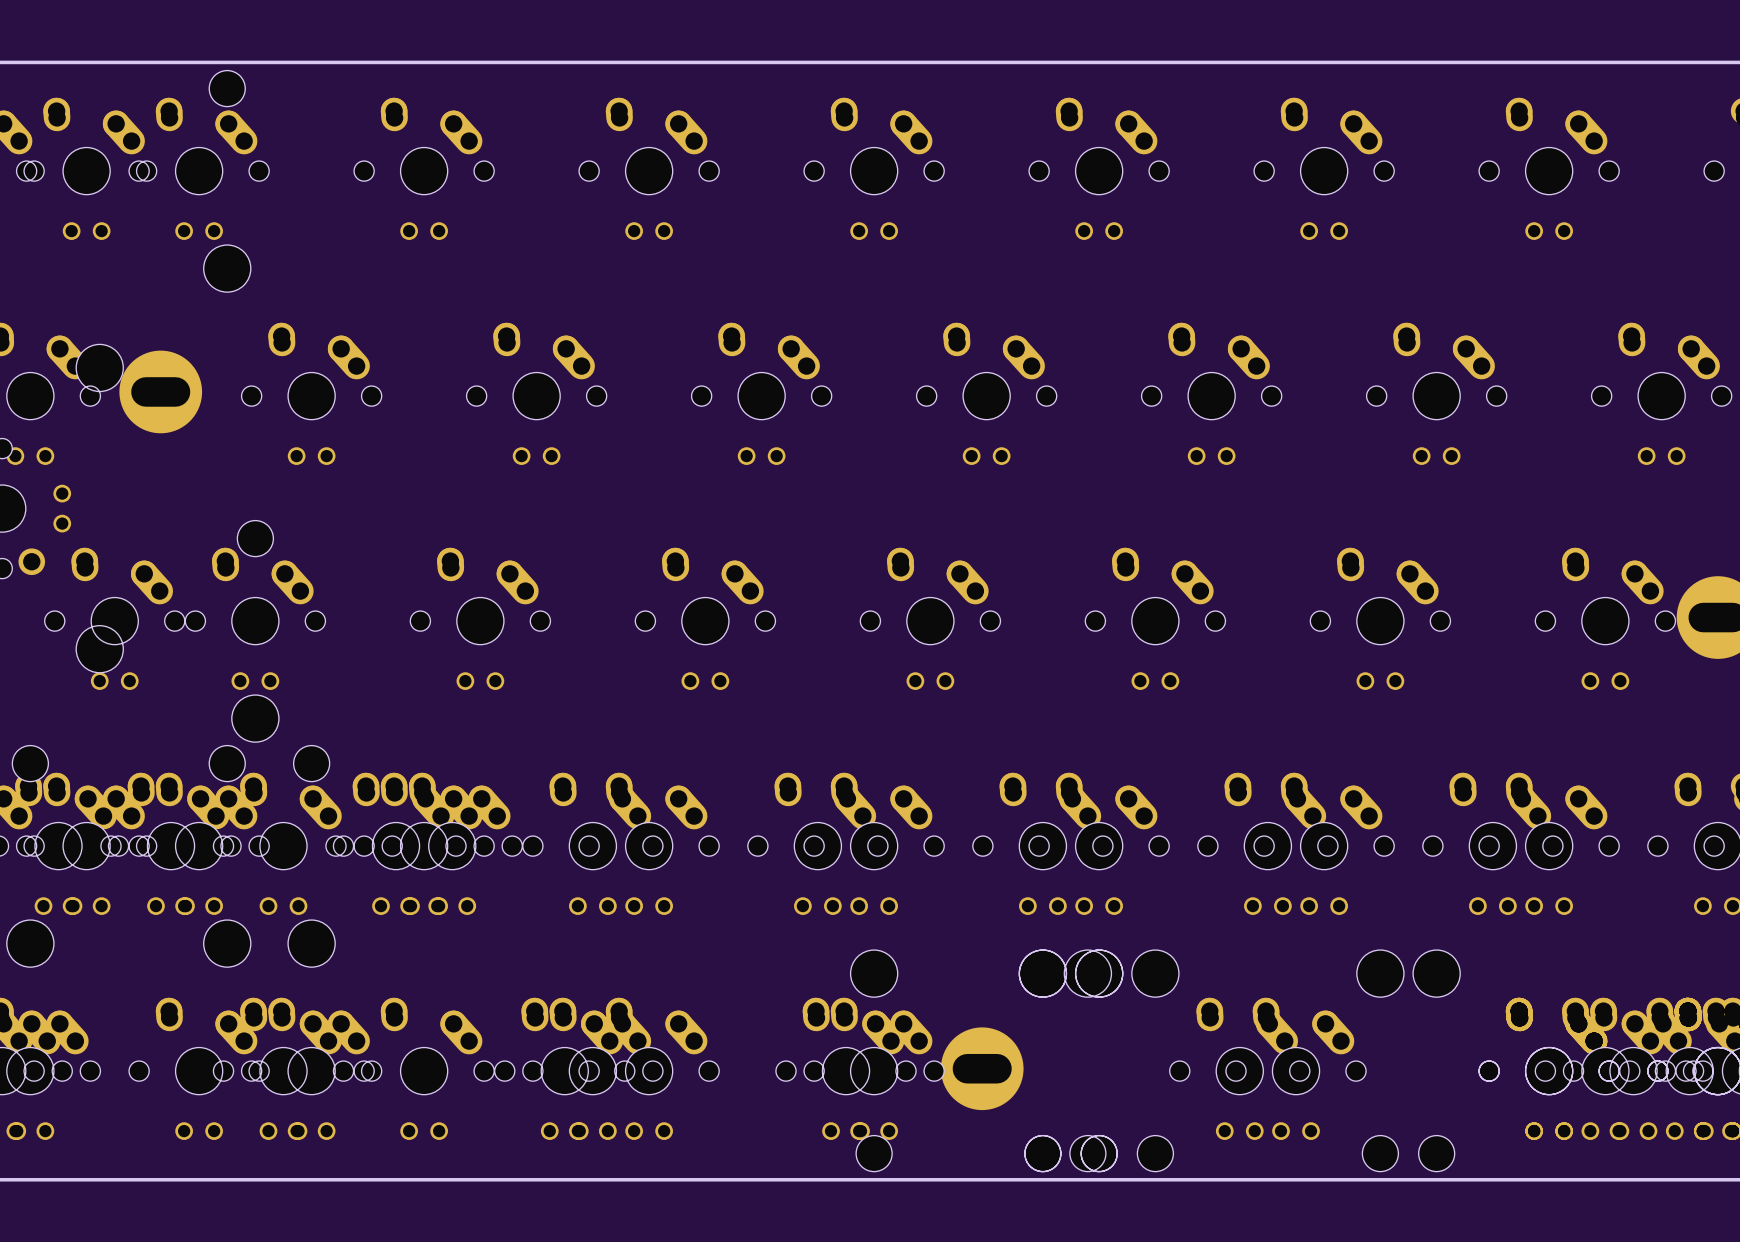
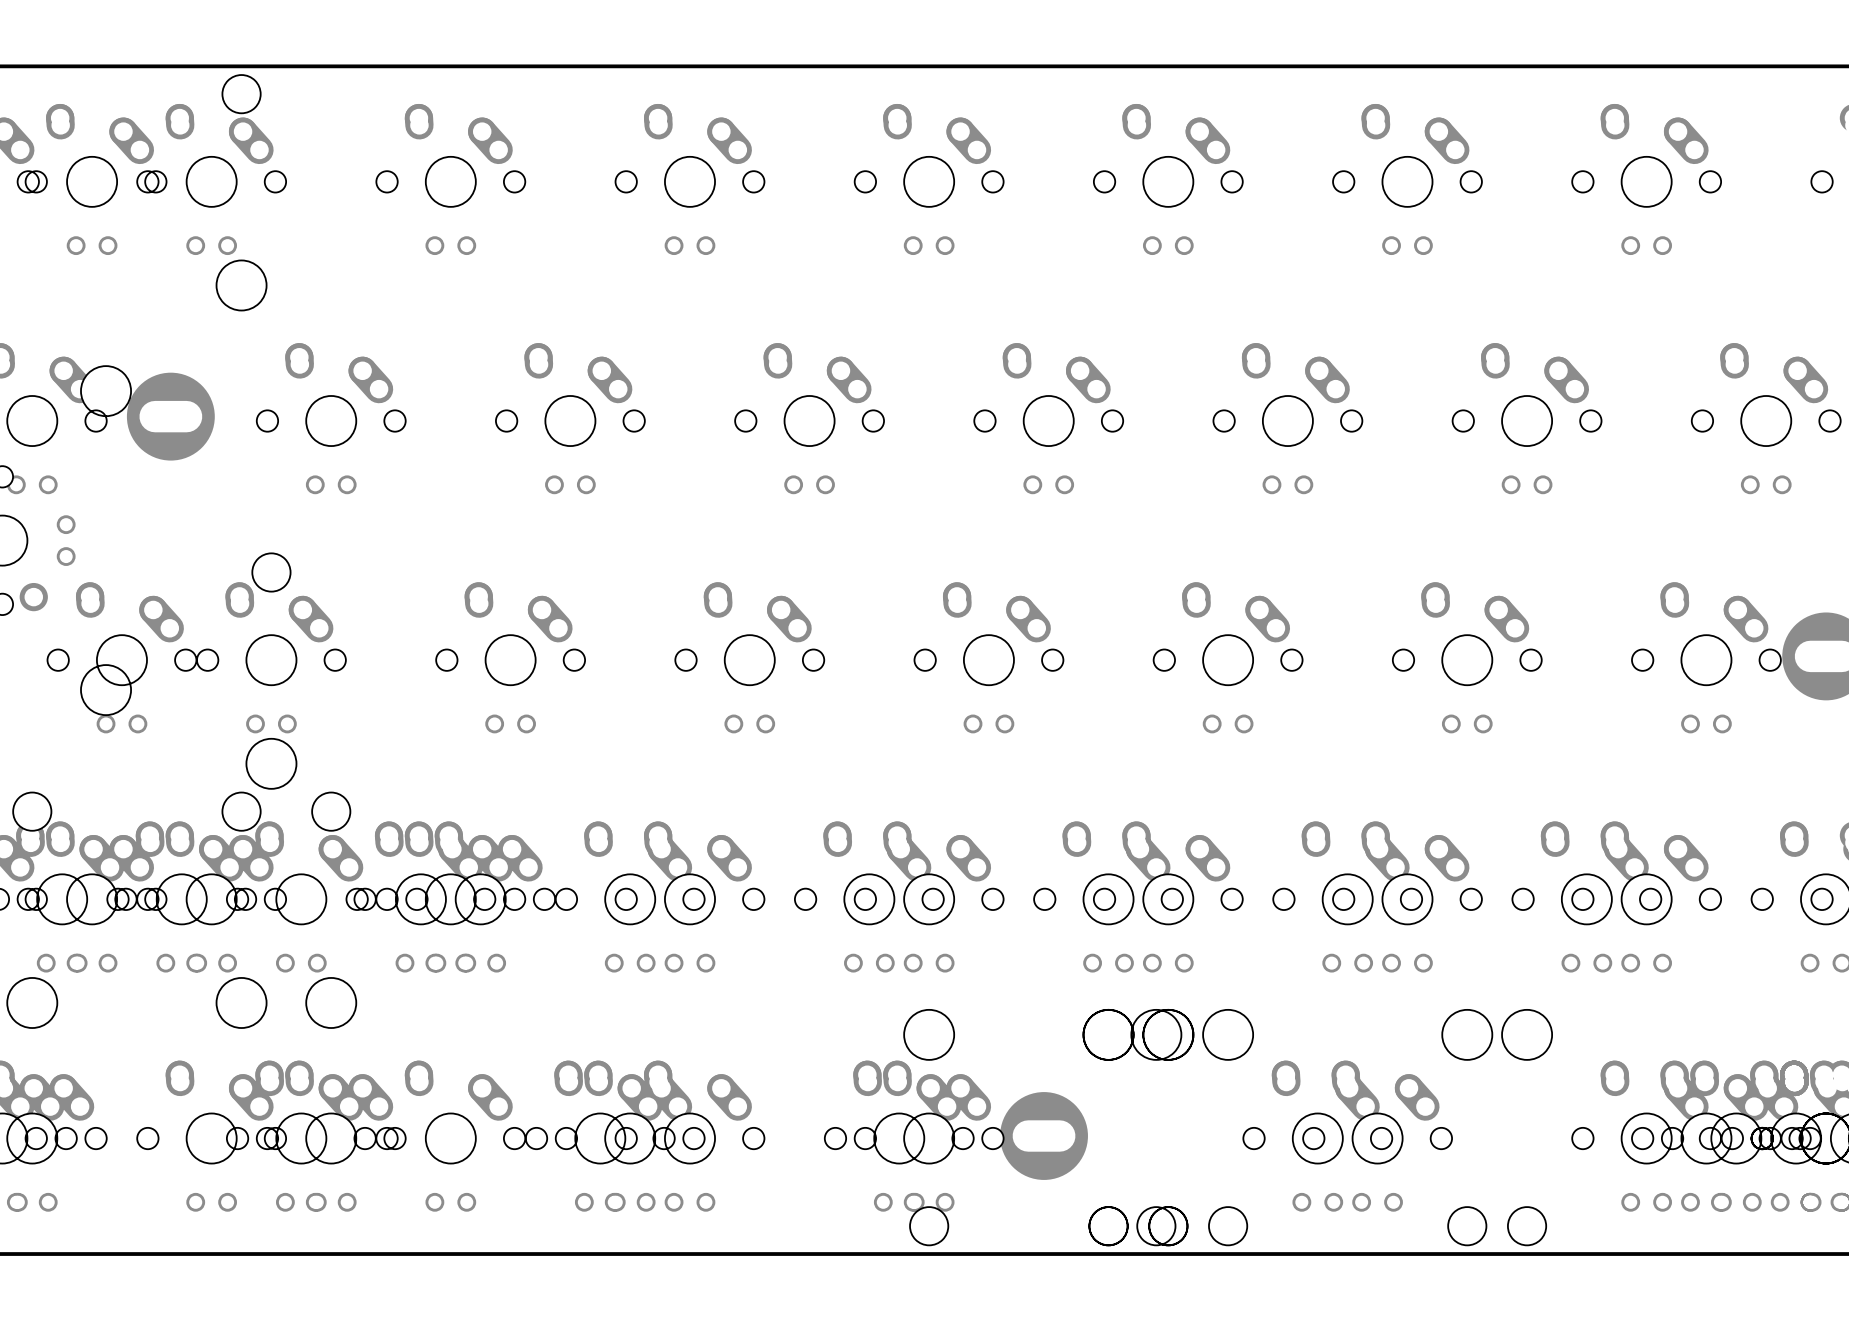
part: (1549, 1068) -> none

